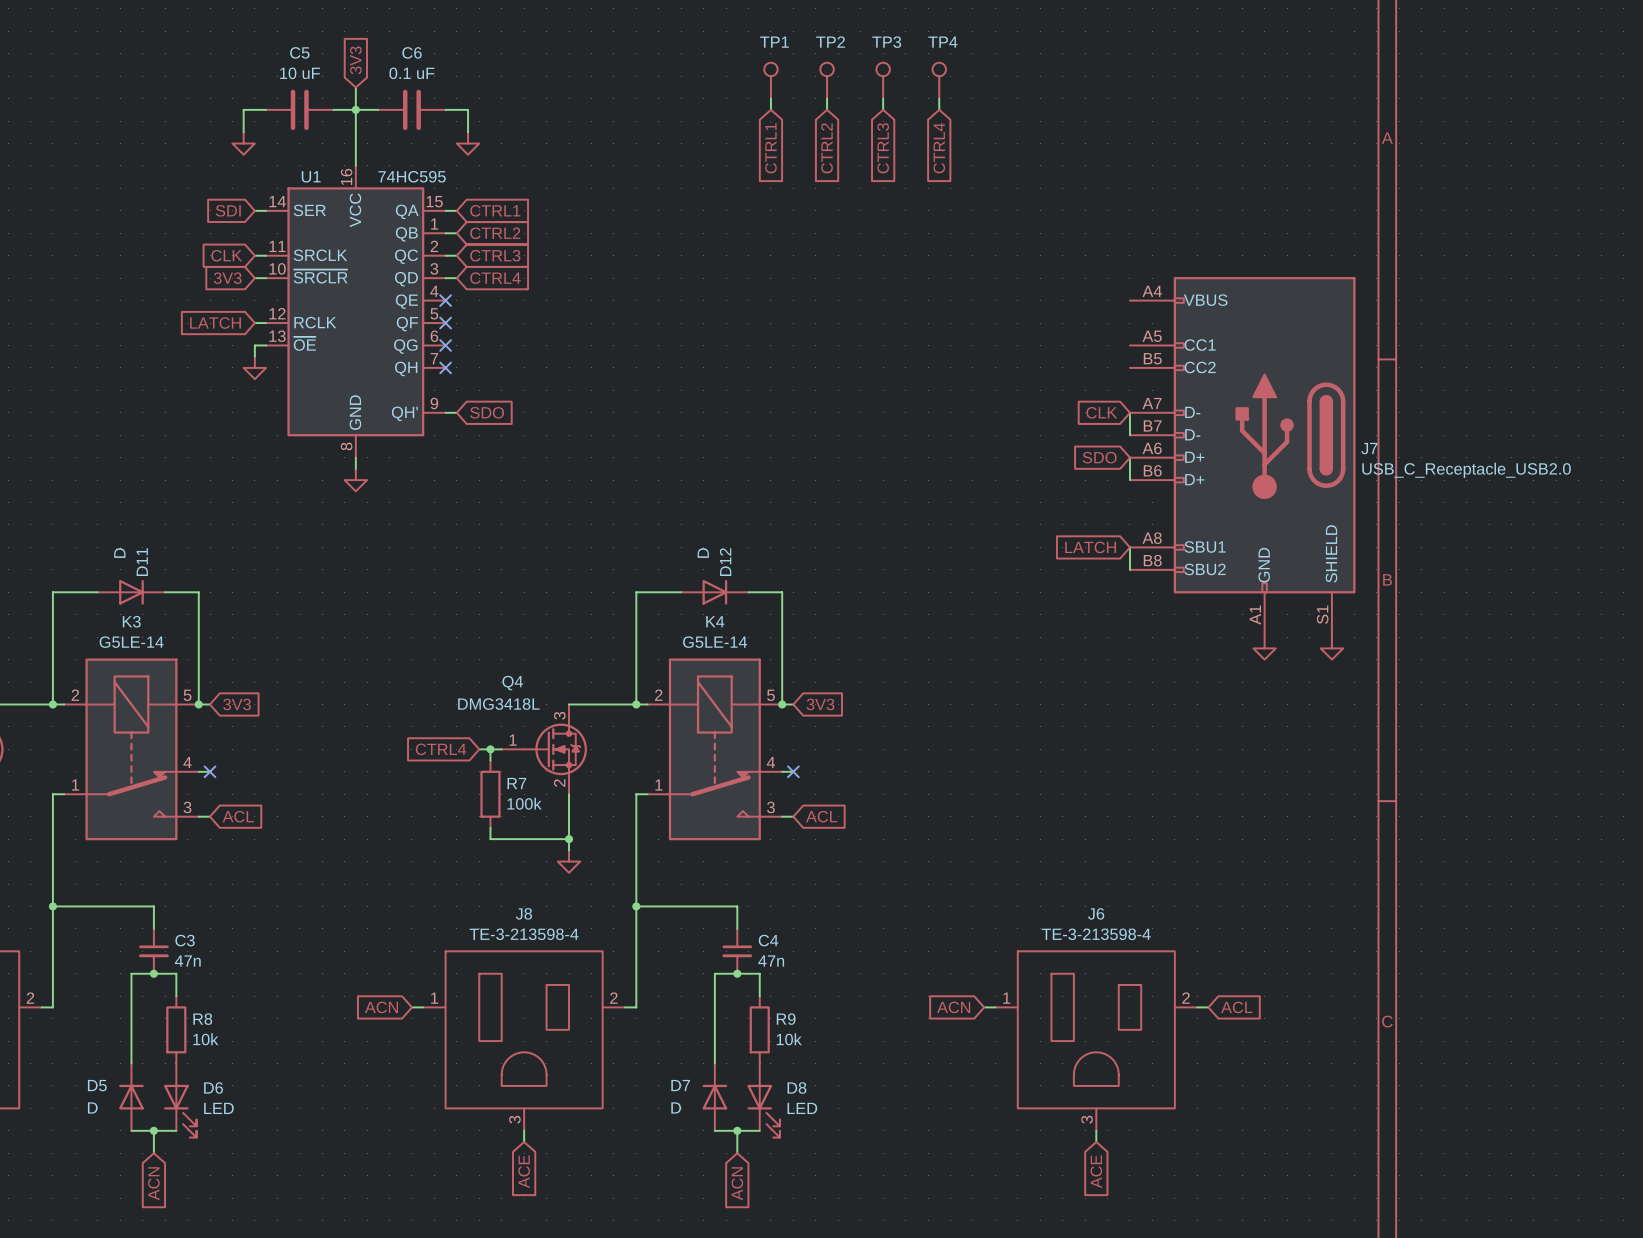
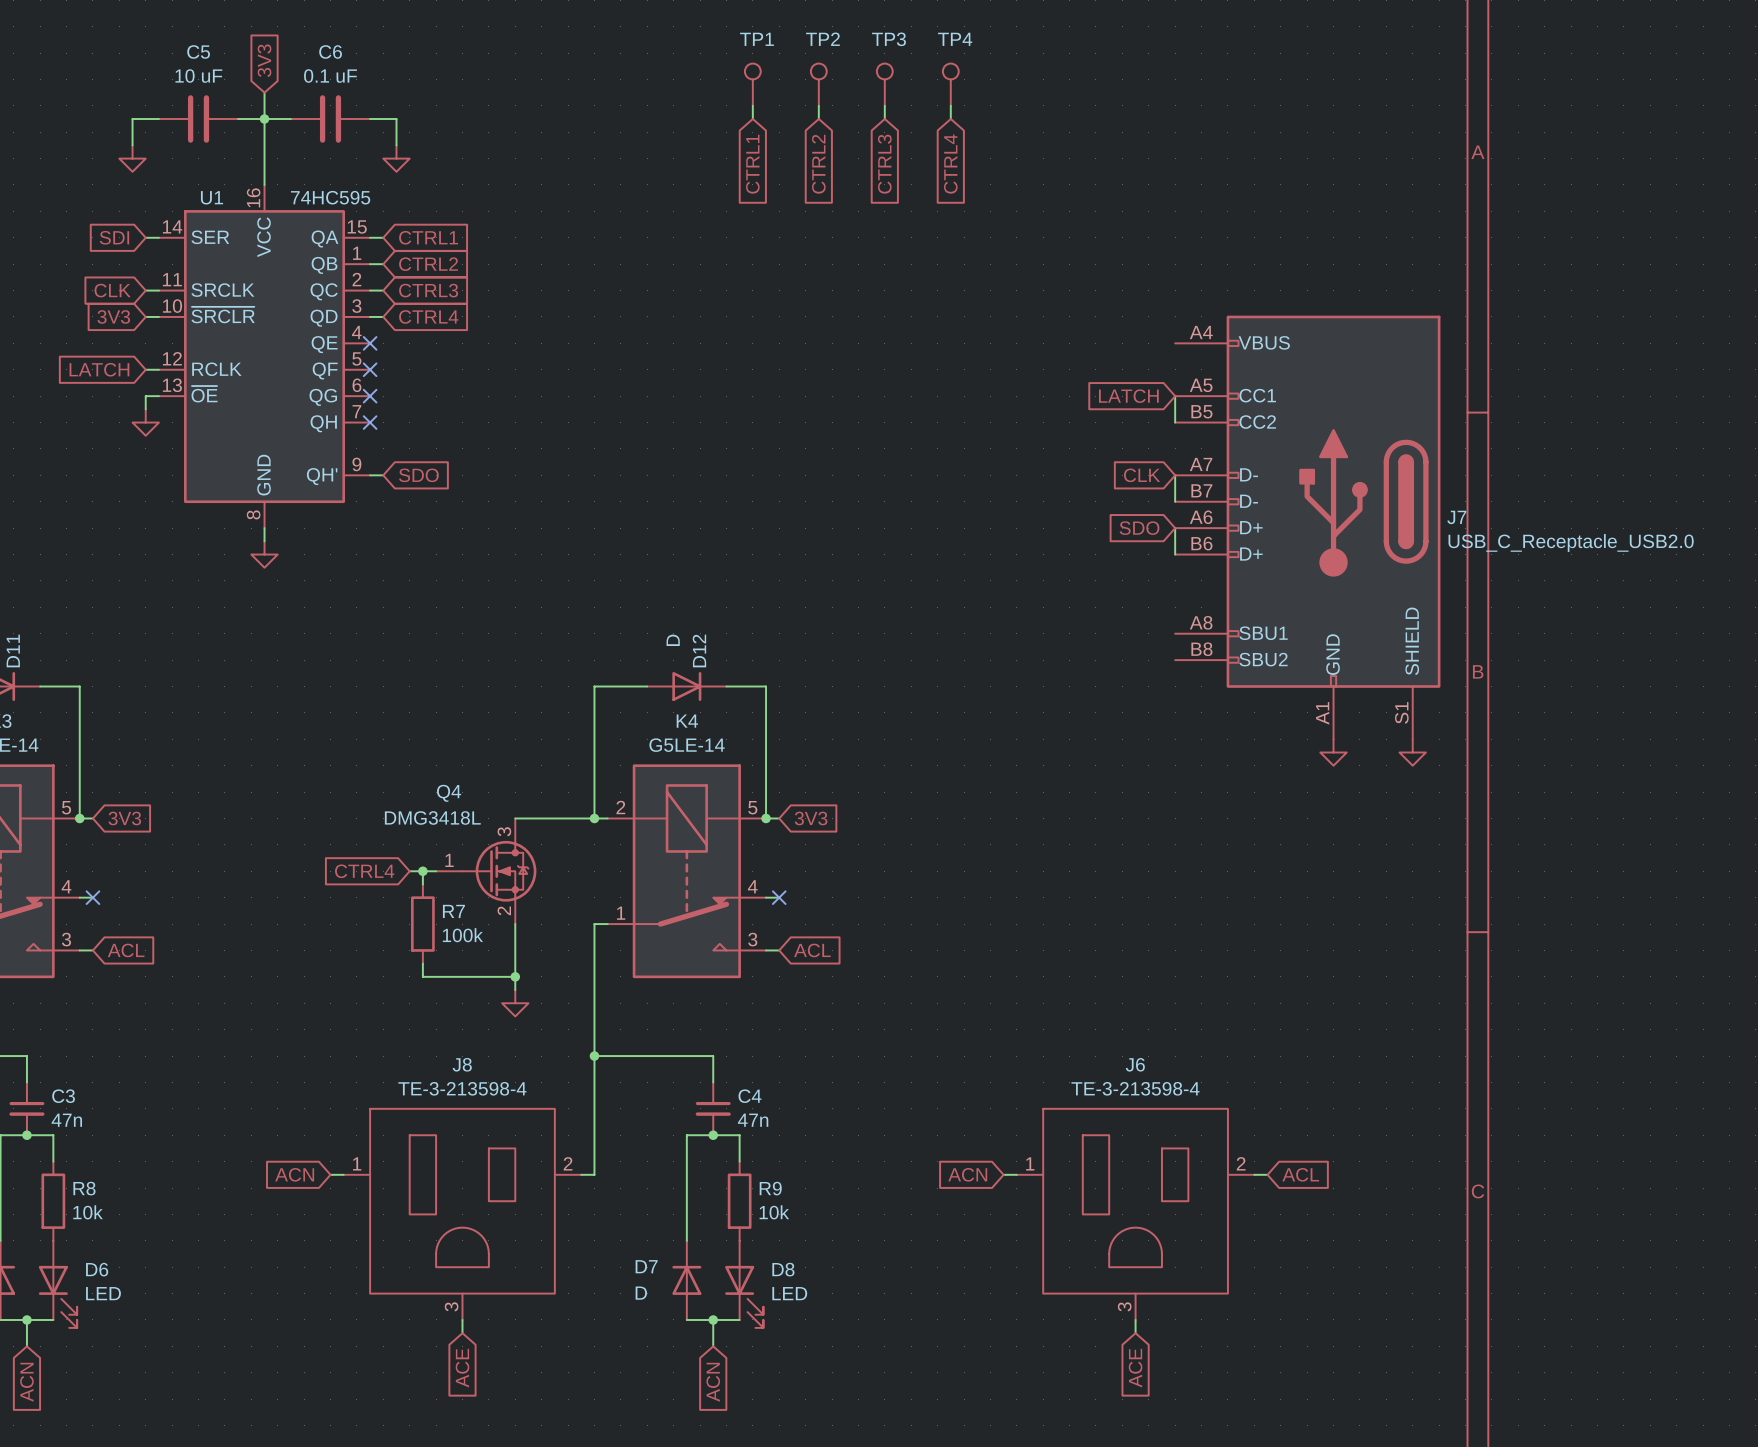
global label position: LATCH (1090, 547) -> LATCH (1128, 396)
wire: (1129, 547) (1129, 569) -> (1175, 396) (1175, 422)

